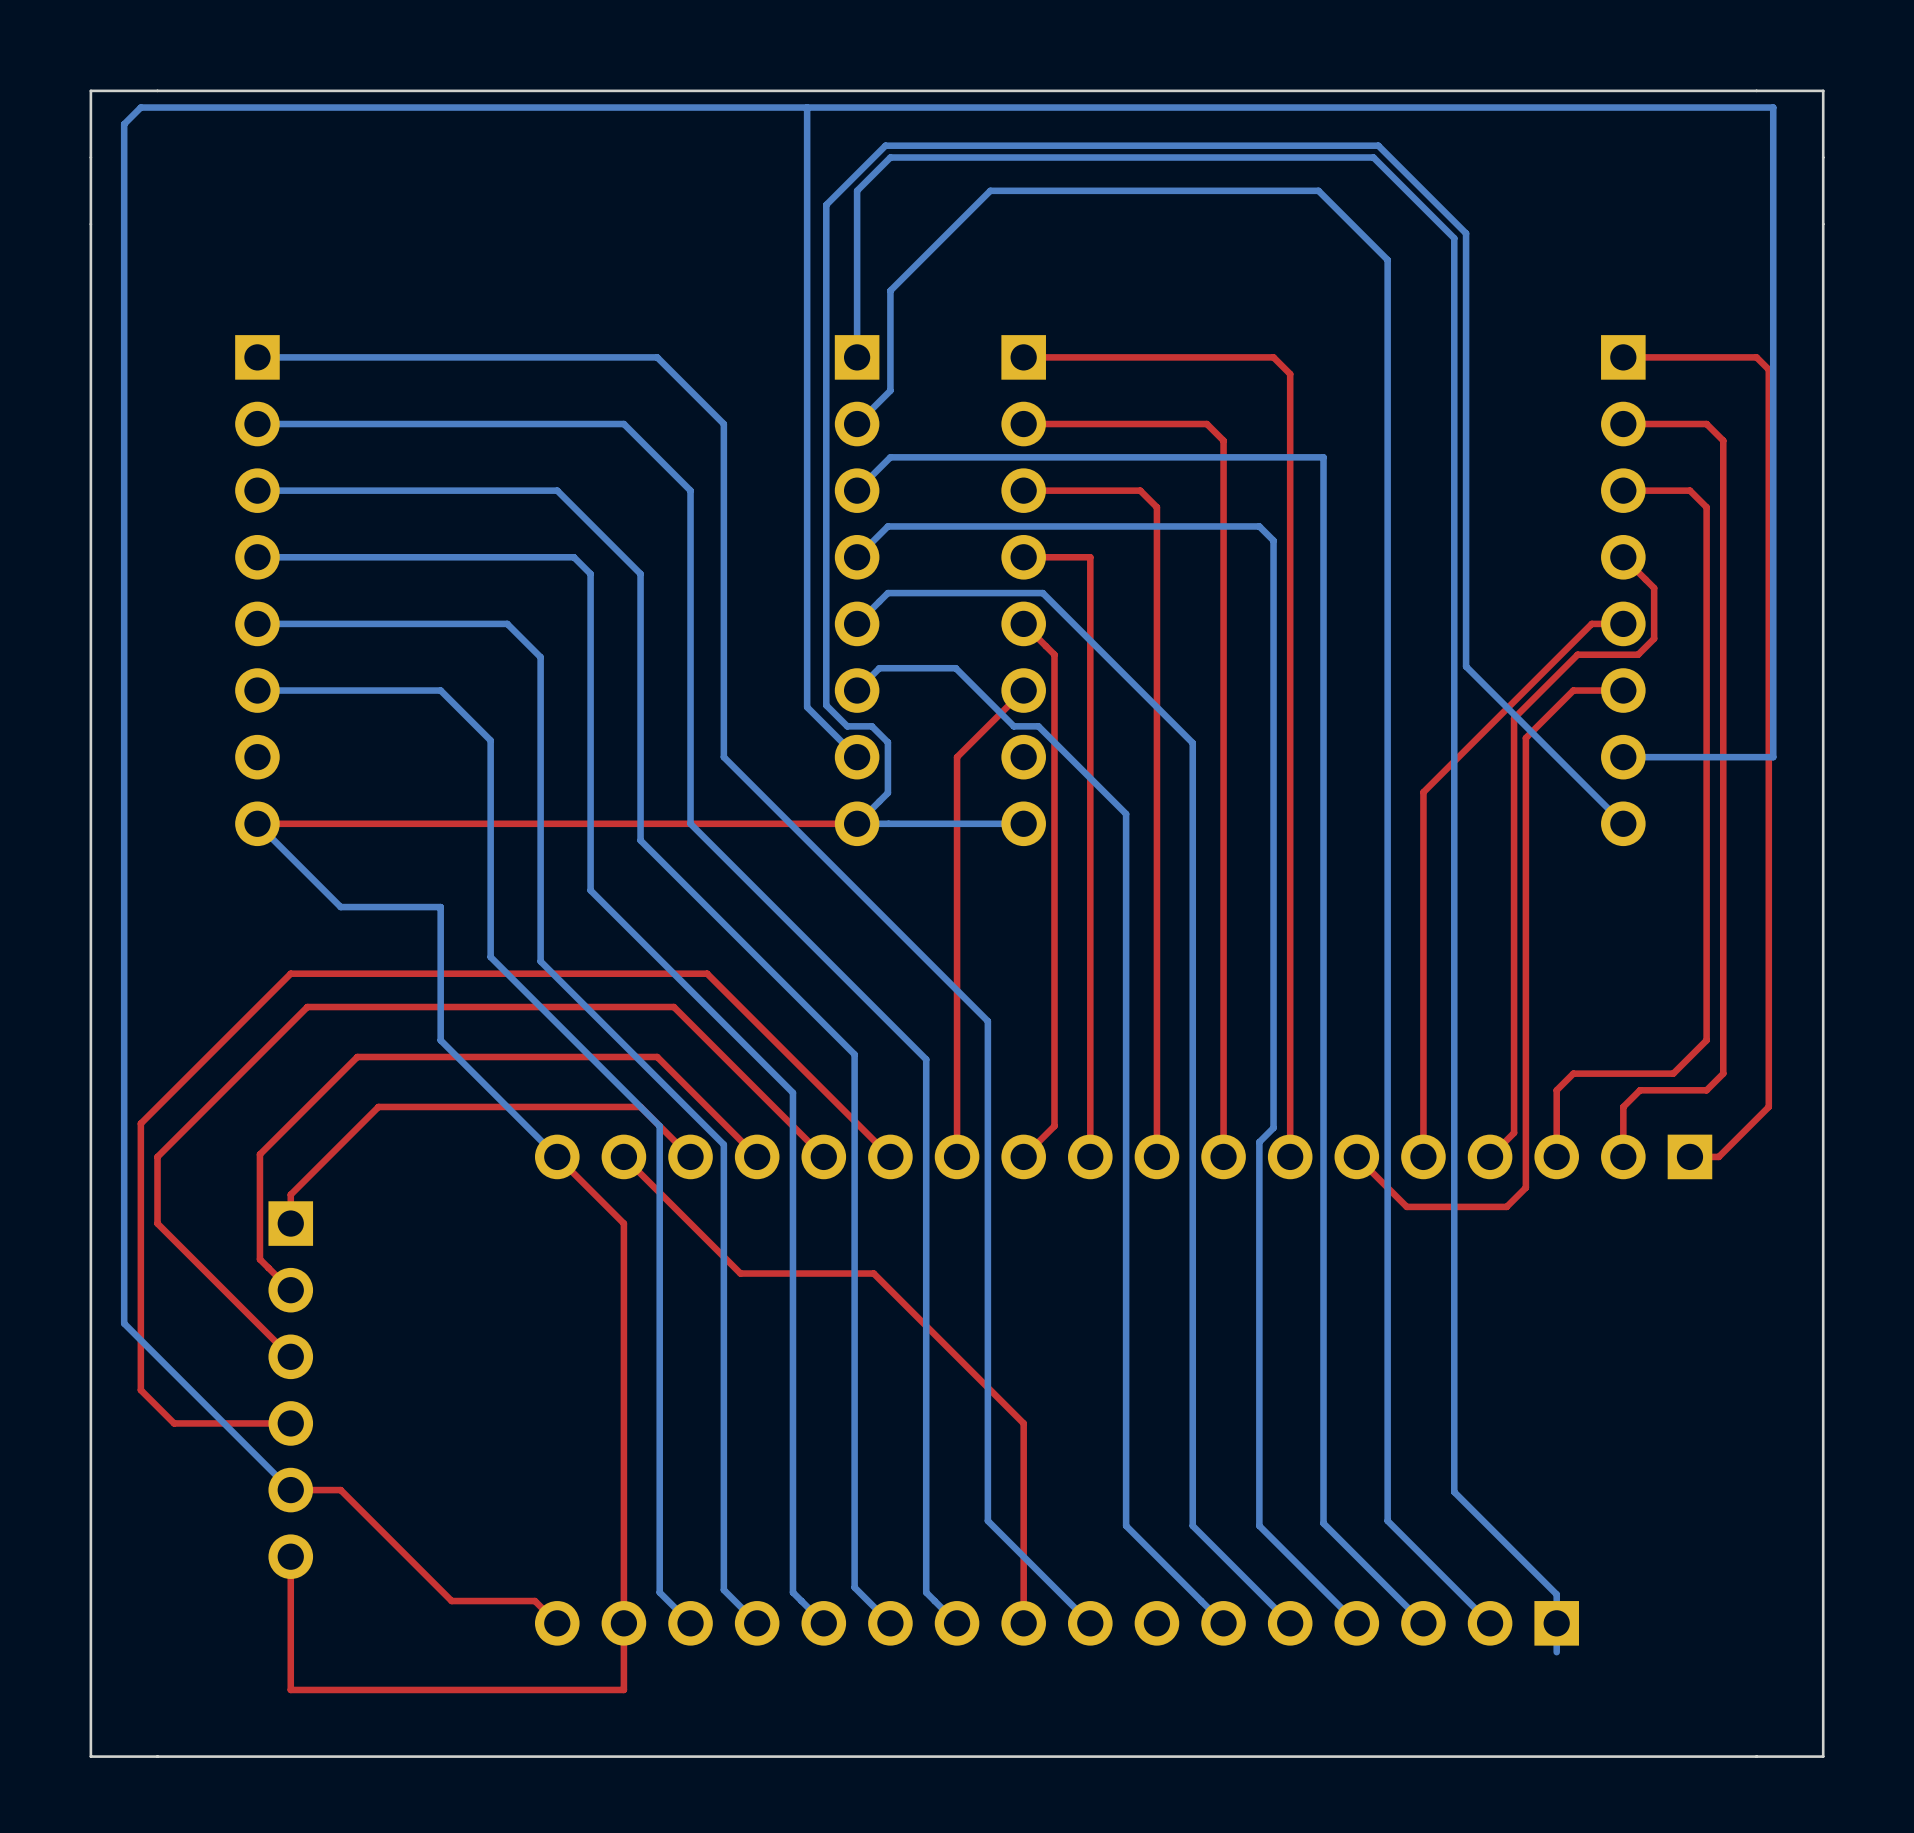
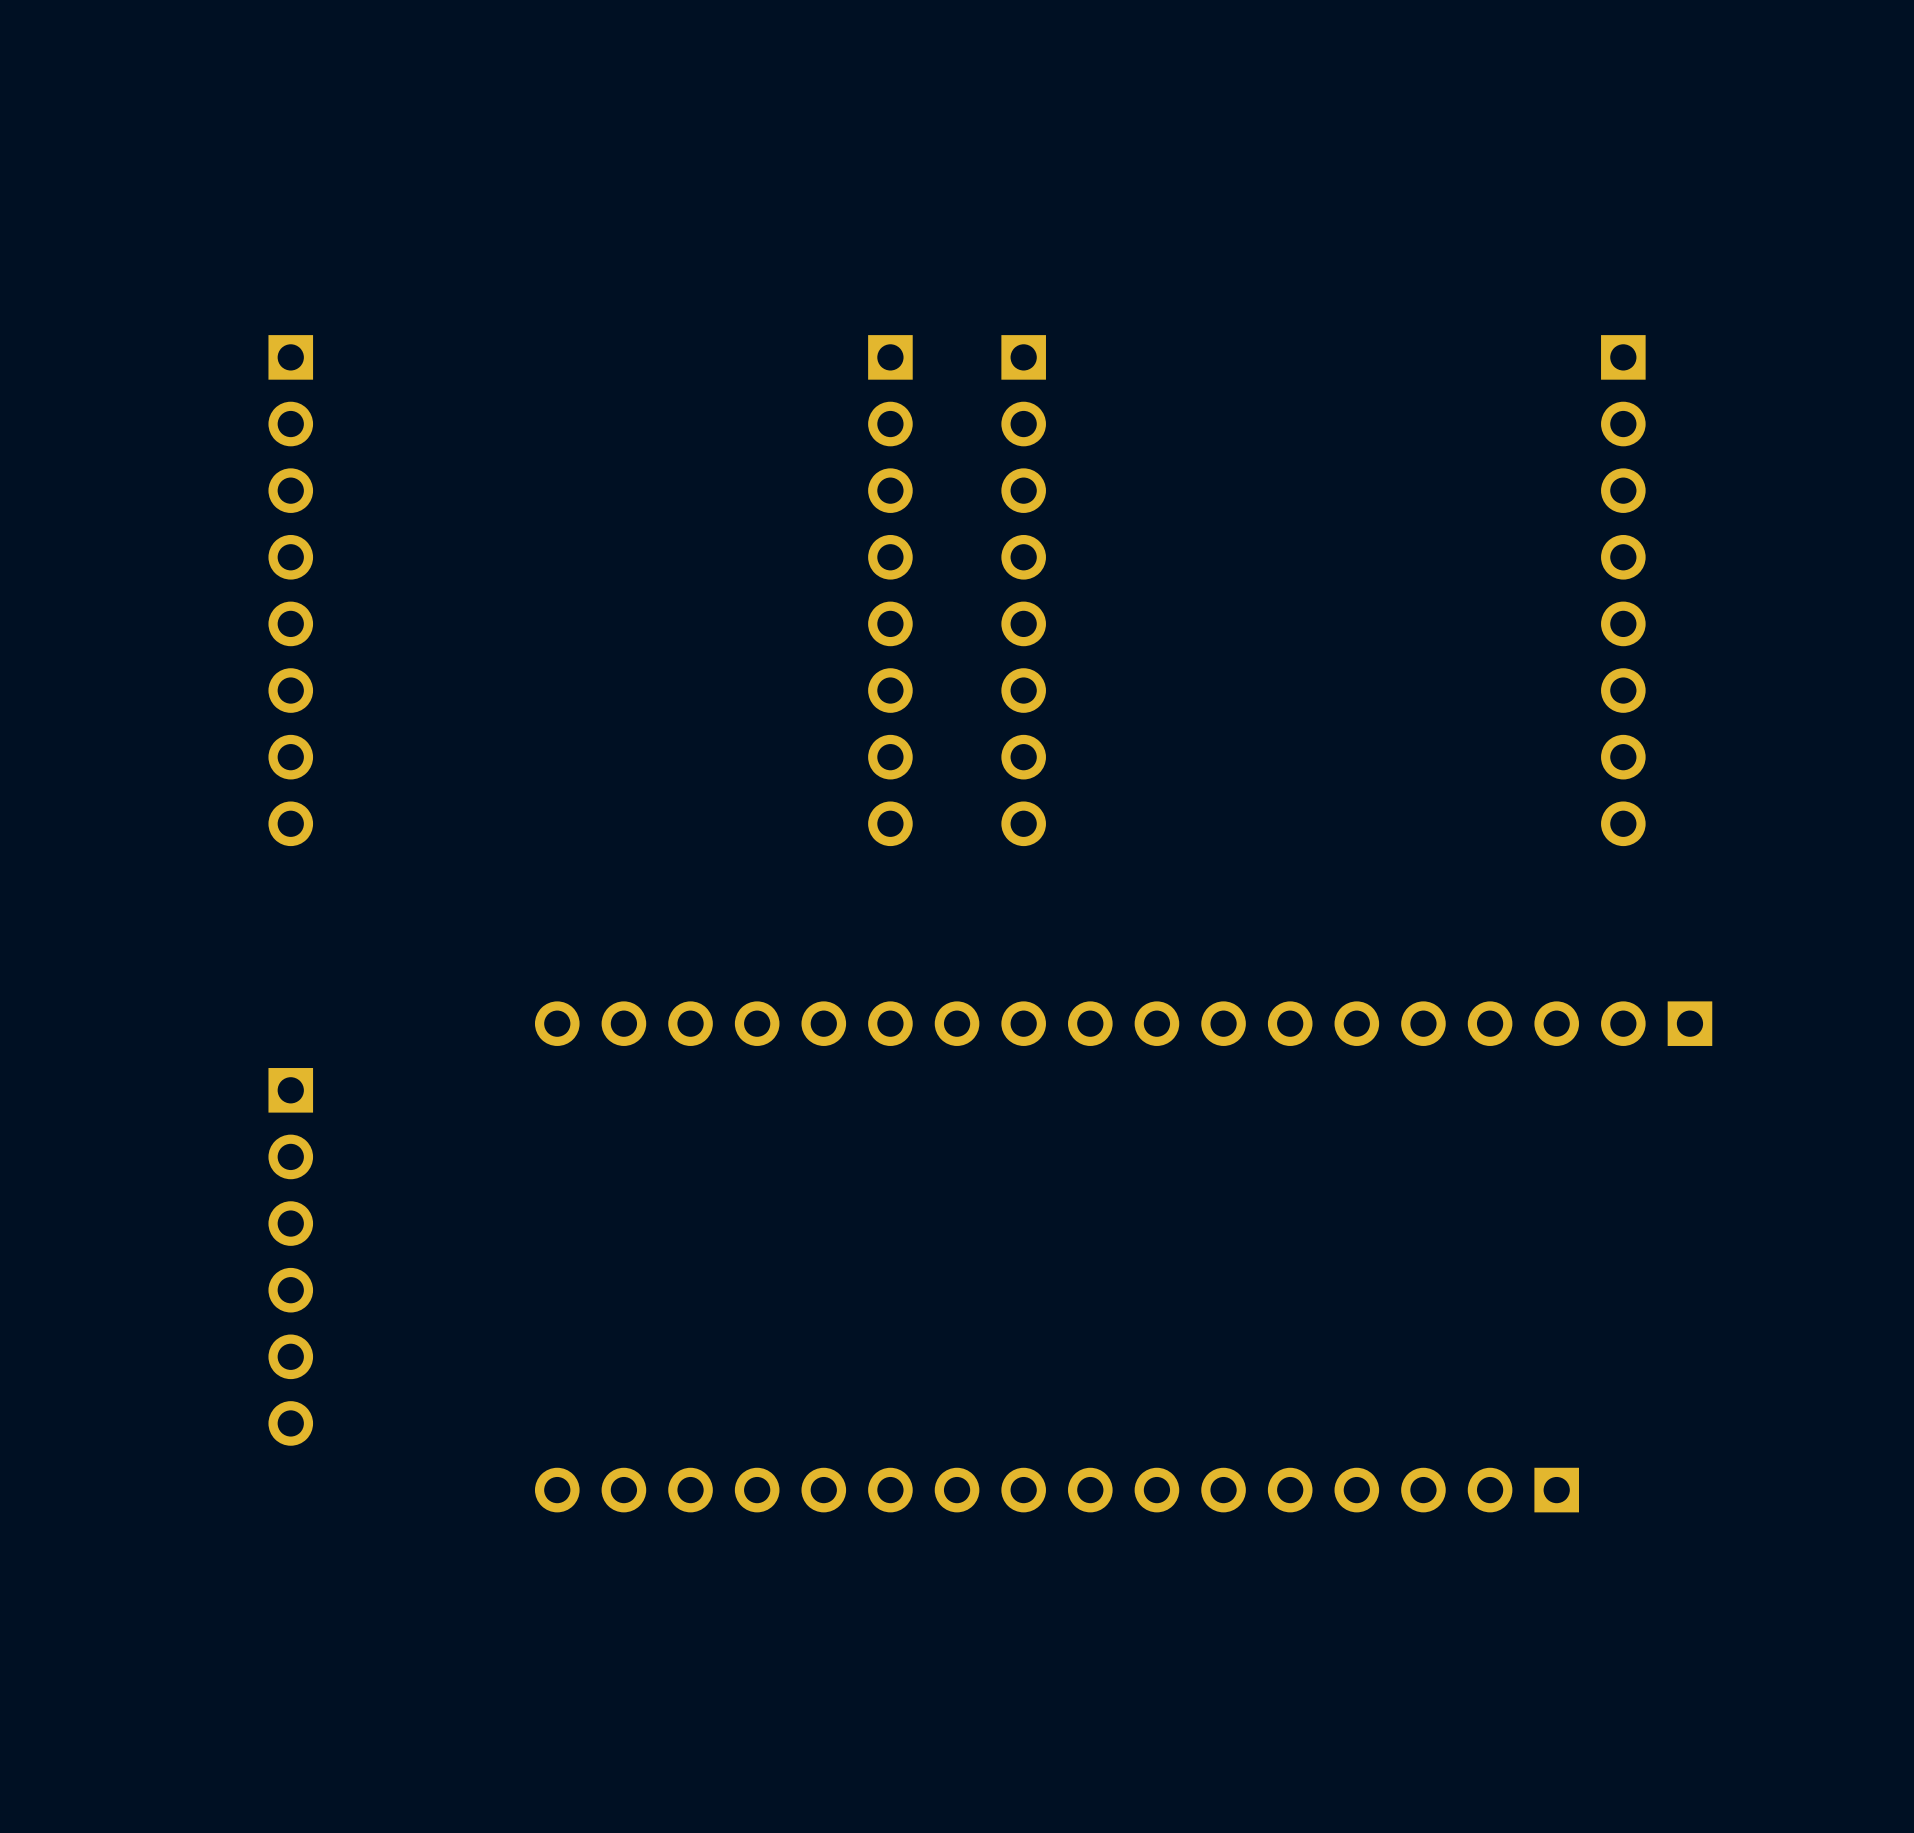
board edge: (1823, 90) (1823, 1756) (90, 1756) (90, 90) (1823, 90) -> none
bottom track: (807, 107) (807, 707) (857, 757) -> none
bottom track: (257, 357) (657, 357) (723, 424) (723, 757) (987, 1021) (987, 1520) (1090, 1623) -> none
bottom track: (857, 357) (857, 190) (890, 157) (1373, 157) (1454, 238) (1454, 1492) (1556, 1594) (1556, 1652) -> none
top track: (1023, 357) (1273, 357) (1290, 374) (1290, 1156) -> none
top track: (1623, 357) (1756, 357) (1768, 369) (1768, 1106) (1718, 1156) (1689, 1156) -> none
bottom track: (257, 424) (623, 424) (690, 490) (690, 823) (926, 1059) (926, 1592) (957, 1623) -> none
bottom track: (857, 424) (890, 390) (890, 290) (990, 190) (1318, 190) (1387, 259) (1387, 1520) (1490, 1623) -> none
top track: (1023, 424) (1206, 424) (1223, 440) (1223, 1156) -> none
top track: (1623, 424) (1706, 424) (1723, 440) (1723, 1073) (1706, 1090) (1639, 1090) (1623, 1106) (1623, 1156) -> none
bottom track: (257, 490) (557, 490) (640, 573) (640, 840) (854, 1054) (854, 1587) (890, 1623) -> none
bottom track: (857, 490) (890, 457) (1323, 457) (1323, 1523) (1423, 1623) -> none
top track: (1023, 490) (1140, 490) (1156, 507) (1156, 1156) -> none
top track: (1623, 490) (1689, 490) (1706, 507) (1706, 1040) (1673, 1073) (1573, 1073) (1556, 1090) (1556, 1156) -> none
bottom track: (257, 557) (573, 557) (590, 573) (590, 890) (792, 1092) (792, 1592) (823, 1623) -> none
bottom track: (857, 557) (887, 526) (1259, 526) (1273, 540) (1273, 1127) (1259, 1142) (1259, 1525) (1356, 1623) -> none
top track: (1023, 557) (1090, 557) (1090, 1156) -> none
top track: (1623, 557) (1654, 588) (1654, 638) (1638, 654) (1577, 654) (1514, 718) (1514, 1132) (1490, 1156) -> none
part position: (257, 590) -> (290, 590)
part position: (857, 590) -> (890, 590)
bottom track: (257, 623) (507, 623) (540, 657) (540, 961) (723, 1144) (723, 1590) (757, 1623) -> none
bottom track: (857, 623) (887, 593) (1042, 593) (1192, 743) (1192, 1525) (1290, 1623) -> none
top track: (1023, 623) (1054, 654) (1054, 1126) (1023, 1156) -> none
top track: (1623, 623) (1591, 623) (1423, 792) (1423, 1156) -> none
bottom track: (257, 690) (440, 690) (490, 740) (490, 957) (659, 1126) (659, 1592) (690, 1623) -> none
bottom track: (857, 690) (879, 668) (955, 668) (1013, 726) (1038, 726) (1126, 813) (1126, 1525) (1223, 1623) -> none
top track: (1023, 690) (957, 757) (957, 1156) -> none
top track: (1623, 690) (1573, 690) (1525, 738) (1525, 1187) (1506, 1206) (1406, 1206) (1356, 1156) -> none
bottom track: (1623, 757) (1773, 757) (1773, 107) (140, 107) (124, 124) (124, 1323) (290, 1490) -> none
bottom track: (257, 823) (340, 907) (440, 907) (440, 1040) (557, 1156) -> none
top track: (857, 823) (257, 823) -> none
bottom track: (1623, 823) (1466, 666) (1466, 233) (1378, 145) (885, 145) (826, 204) (826, 705) (847, 726) (871, 726) (887, 742) (887, 792) (857, 823) (1023, 823) -> none
top track: (557, 1156) (623, 1223) (623, 1689) (290, 1689) (290, 1556) -> none
top track: (623, 1156) (740, 1273) (873, 1273) (1023, 1423) (1023, 1623) -> none
top track: (690, 1156) (640, 1106) (378, 1106) (290, 1194) (290, 1223) -> none
top track: (757, 1156) (657, 1056) (357, 1056) (259, 1154) (259, 1259) (290, 1290) -> none
top track: (823, 1156) (673, 1007) (307, 1007) (157, 1156) (157, 1223) (290, 1356) -> none
top track: (890, 1156) (707, 973) (290, 973) (140, 1123) (140, 1390) (174, 1423) (290, 1423) -> none
part position: (1123, 1156) -> (1123, 1023)
part position: (290, 1390) -> (290, 1256)
top track: (290, 1490) (340, 1490) (451, 1601) (534, 1601) (557, 1623) -> none
part position: (1056, 1623) -> (1056, 1490)

